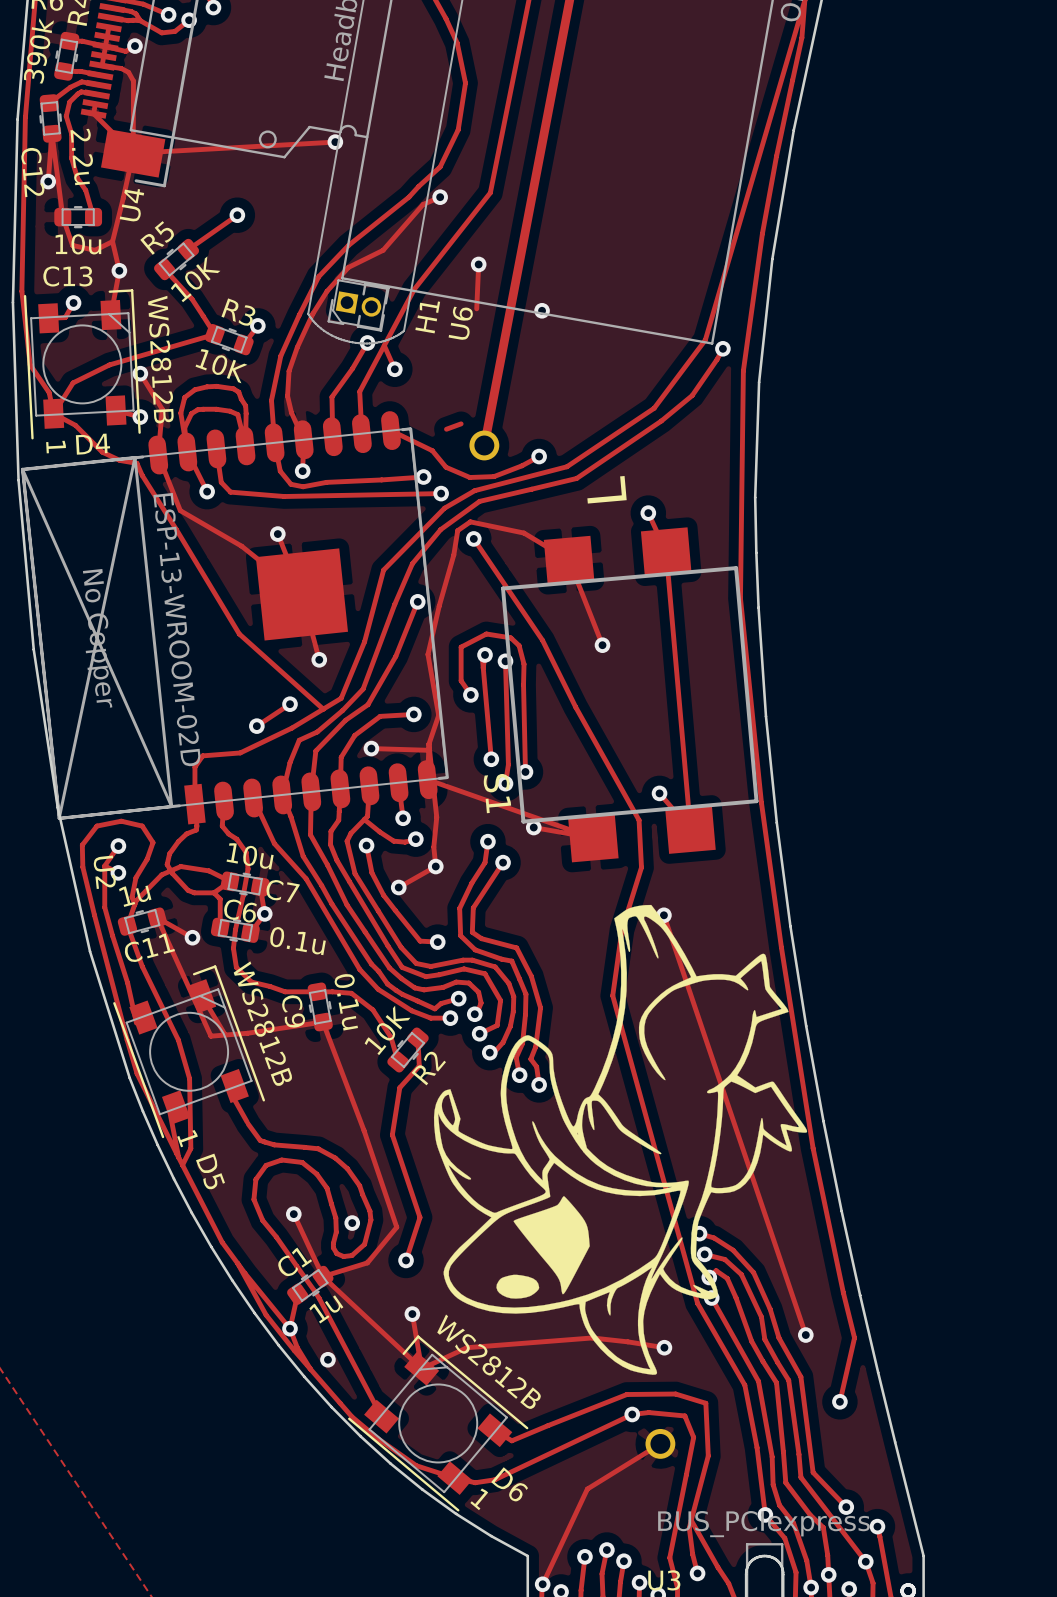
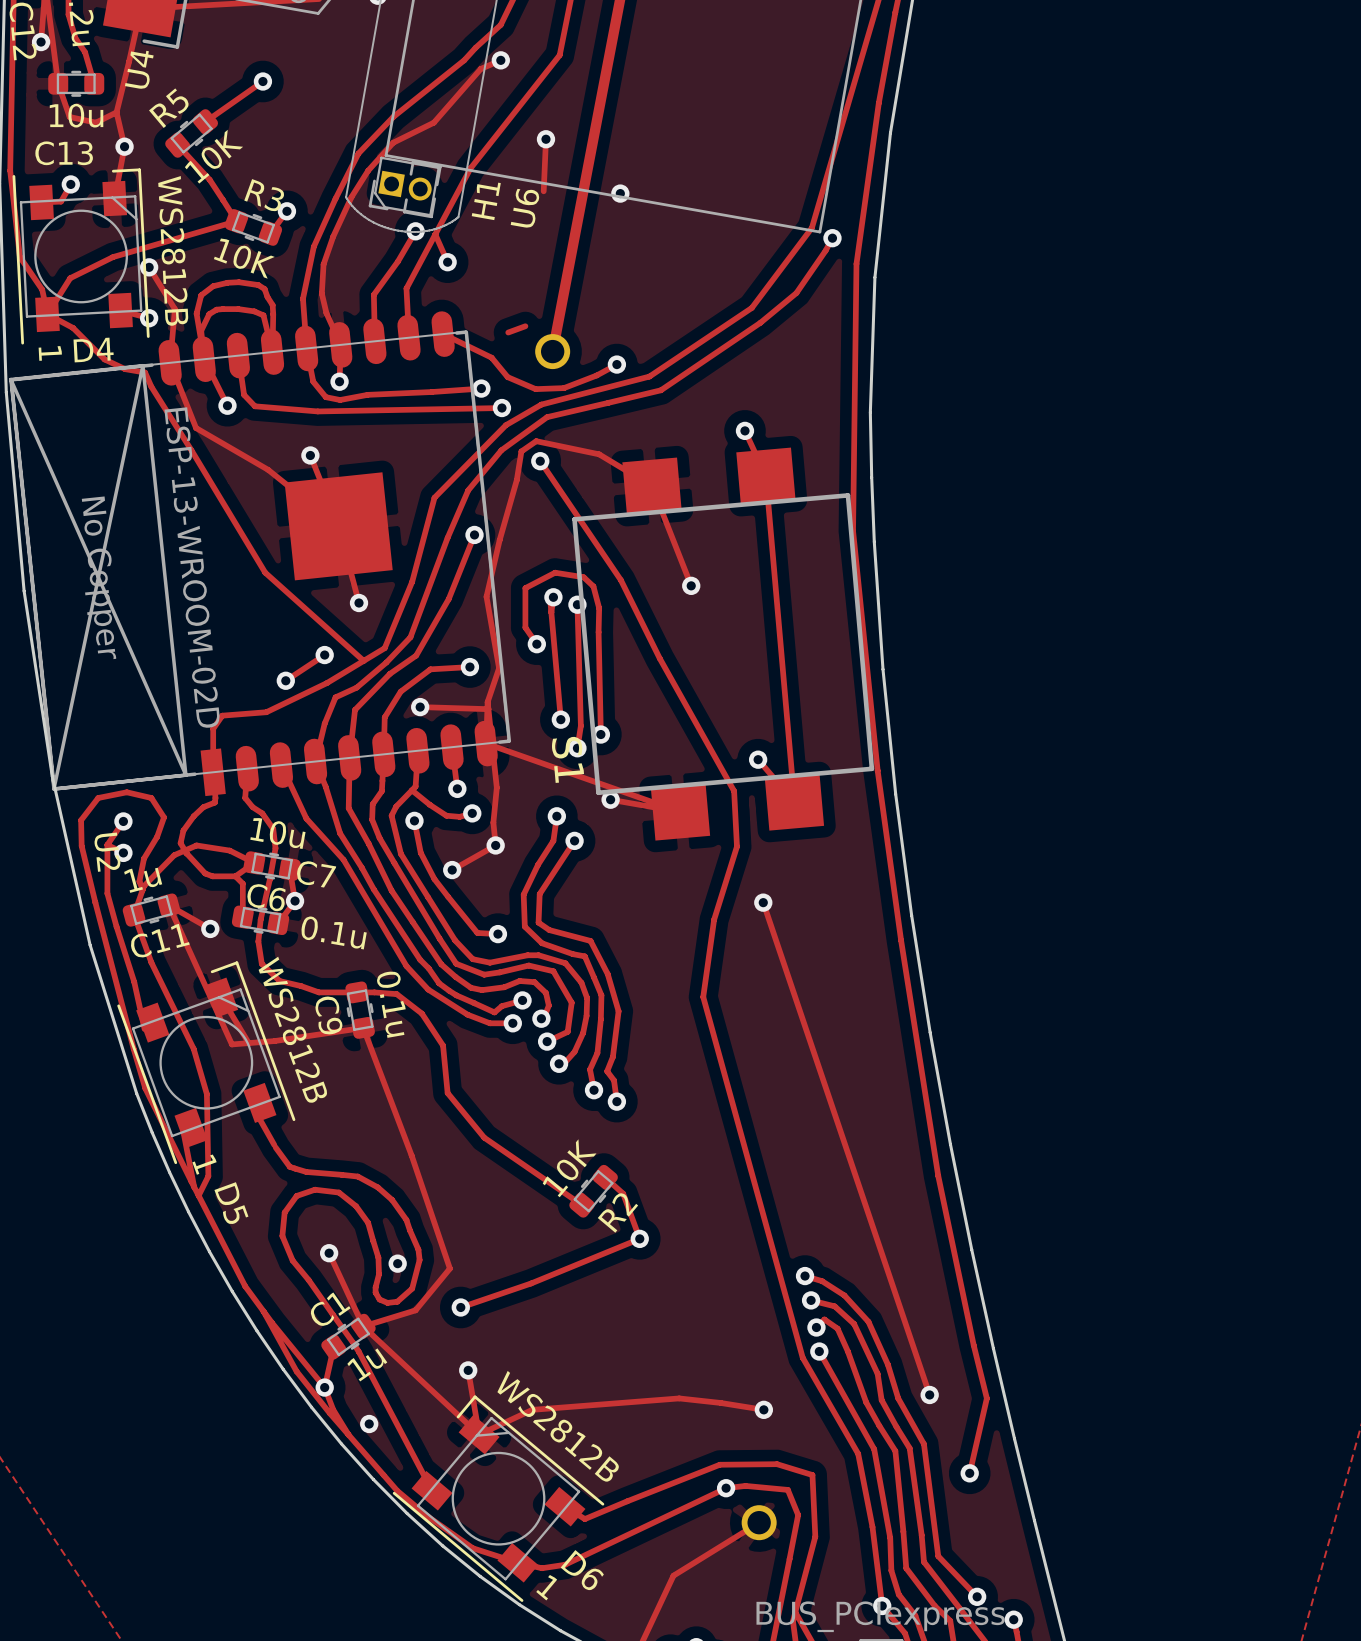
text: L (607, 489) -> none
drawing: [433, 904, 808, 1375] -> none
track: (390, 1037) (398, 1061) -> (443, 1045) (447, 1093) (484, 1137) (582, 1205)
track: (417, 1038) (419, 1066) (399, 1087) (392, 1134) (420, 1217) (406, 1260) -> (605, 1177) (623, 1193) (639, 1238) (531, 1283) (460, 1307)
R2 position: (408, 1050) -> (593, 1191)
via: none -> (639, 1238)

